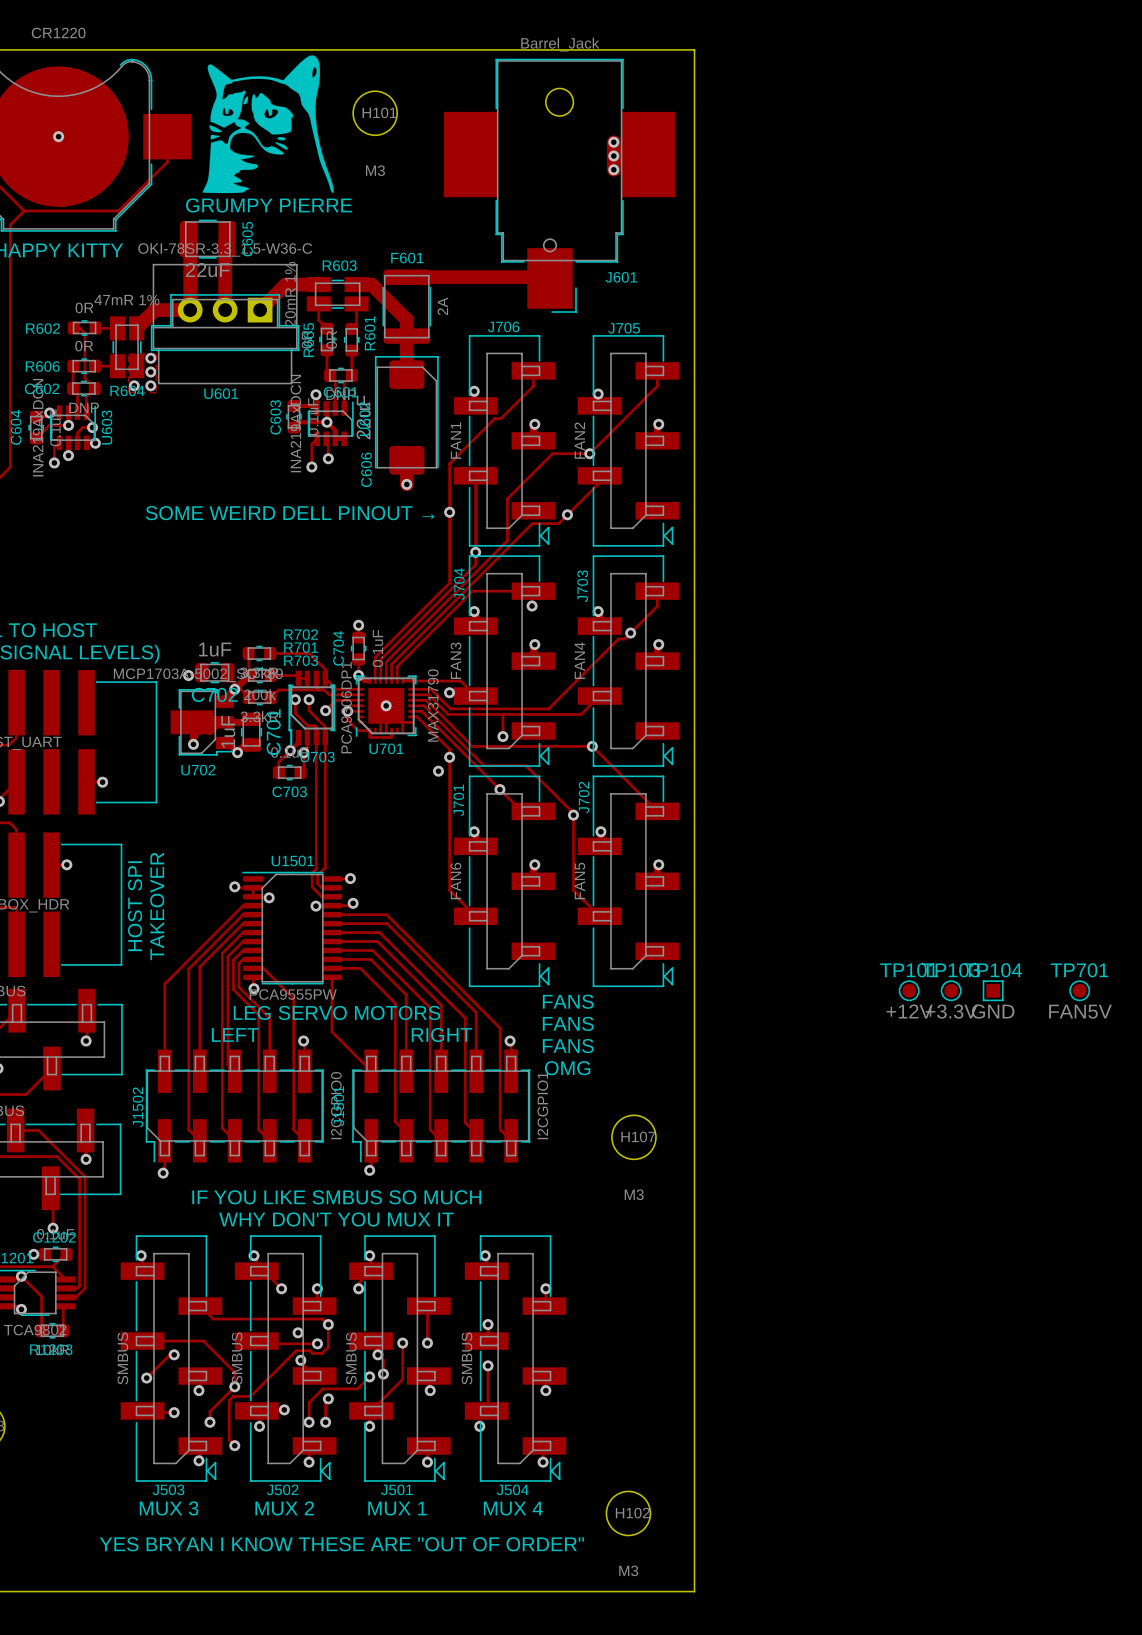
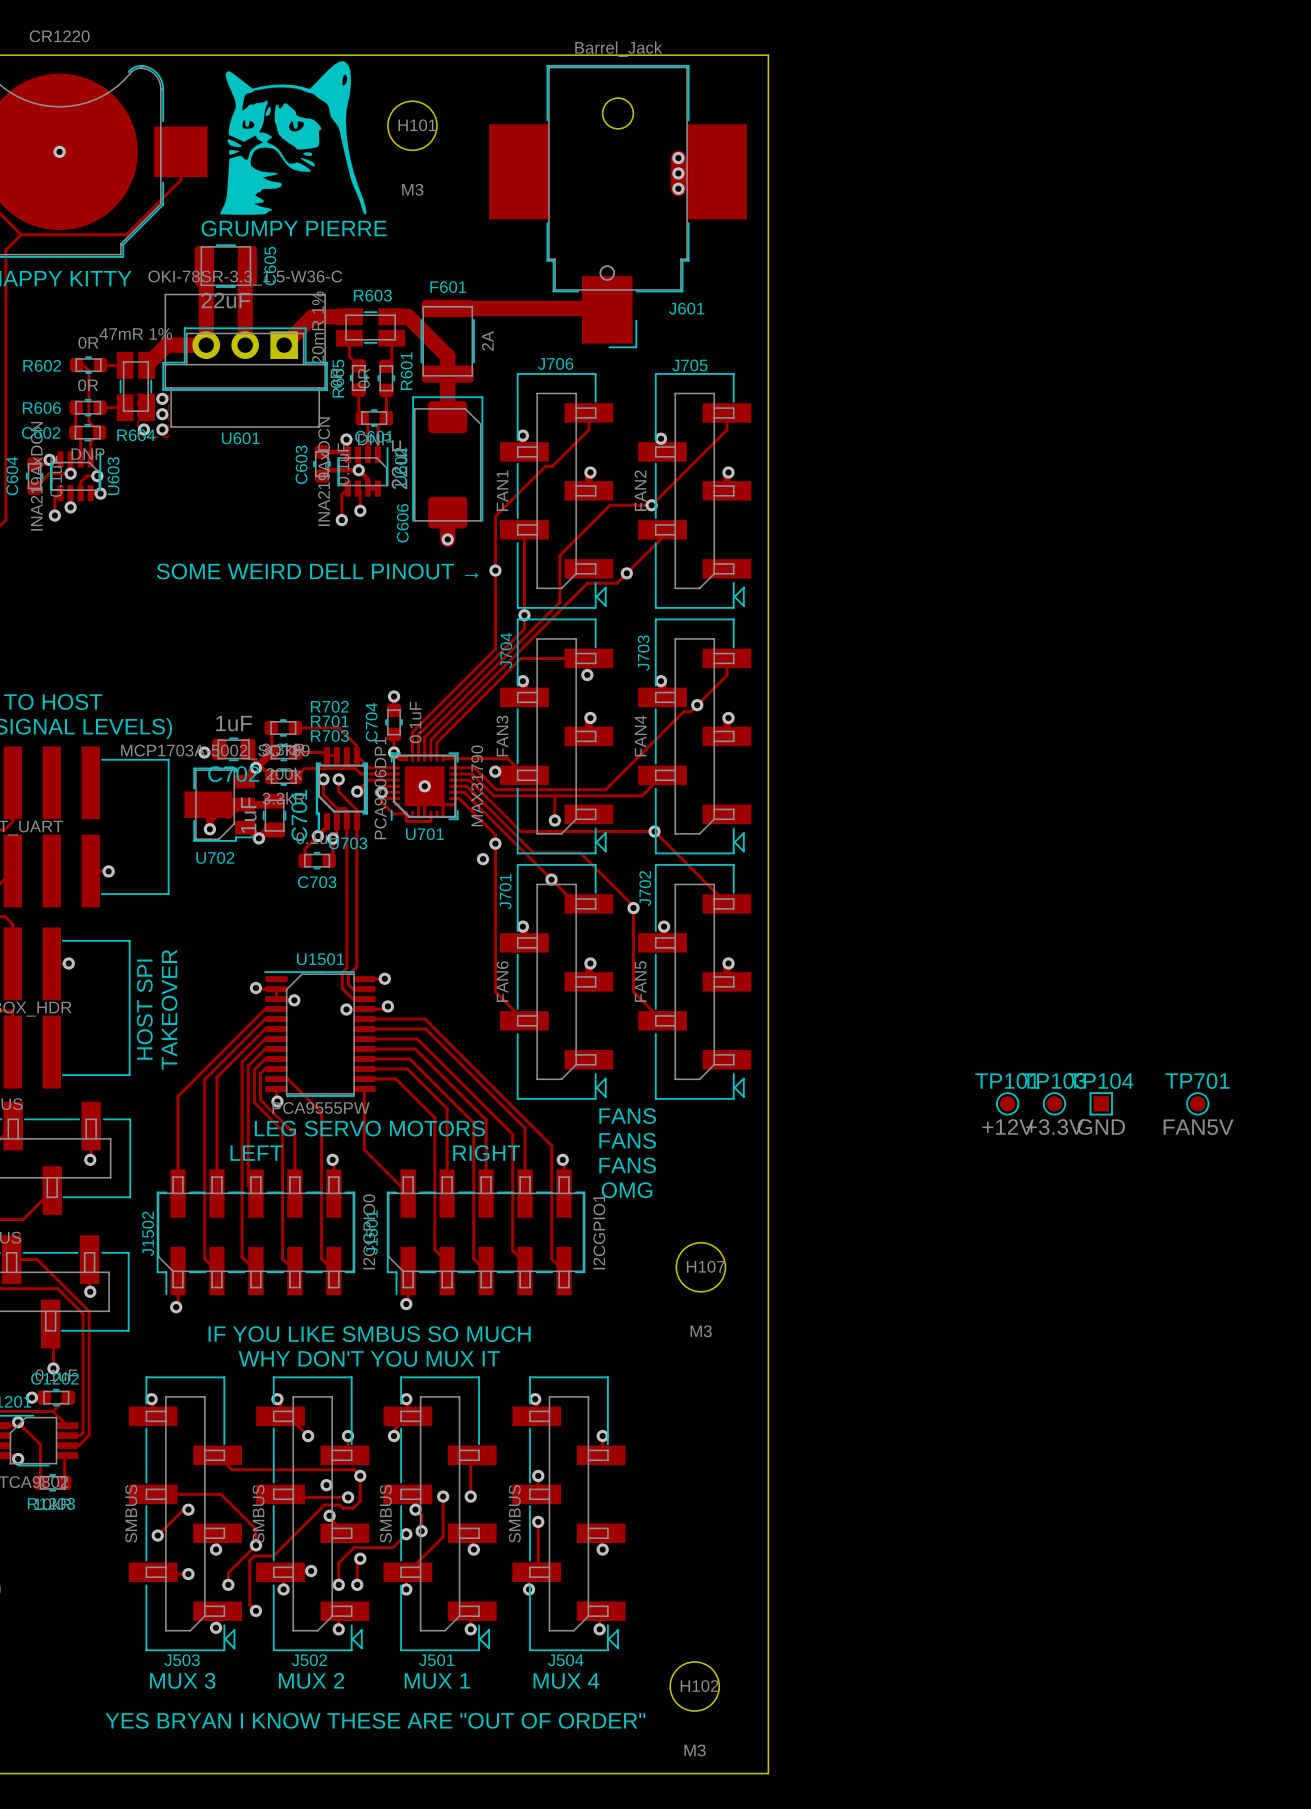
track: none -> (381, 792) (387, 798) (397, 798)

